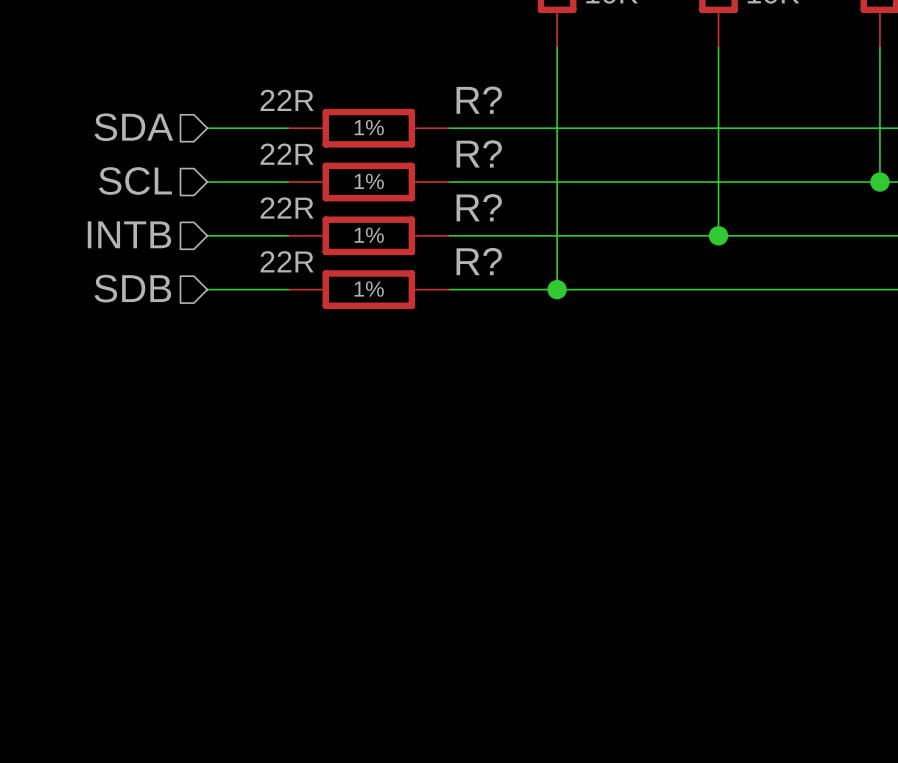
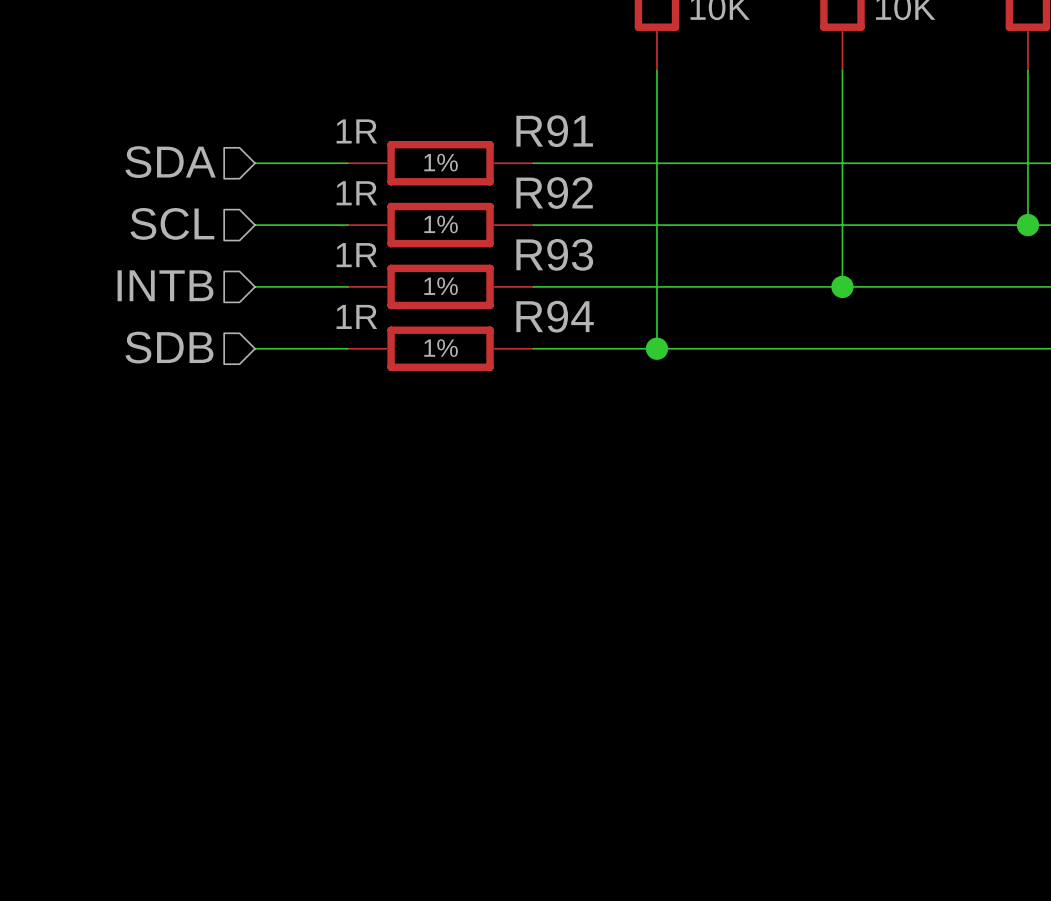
R? value: 22R (287, 100) -> 1R (356, 131)
R? name: R? (479, 100) -> R91 (554, 131)
R? name: R? (479, 153) -> R92 (554, 193)
R? value: 22R (287, 154) -> 1R (356, 193)
R? value: 22R (287, 207) -> 1R (356, 255)
R? name: R? (479, 207) -> R93 (554, 254)
R? value: 22R (287, 261) -> 1R (356, 316)
R? name: R? (479, 261) -> R94 (555, 316)

